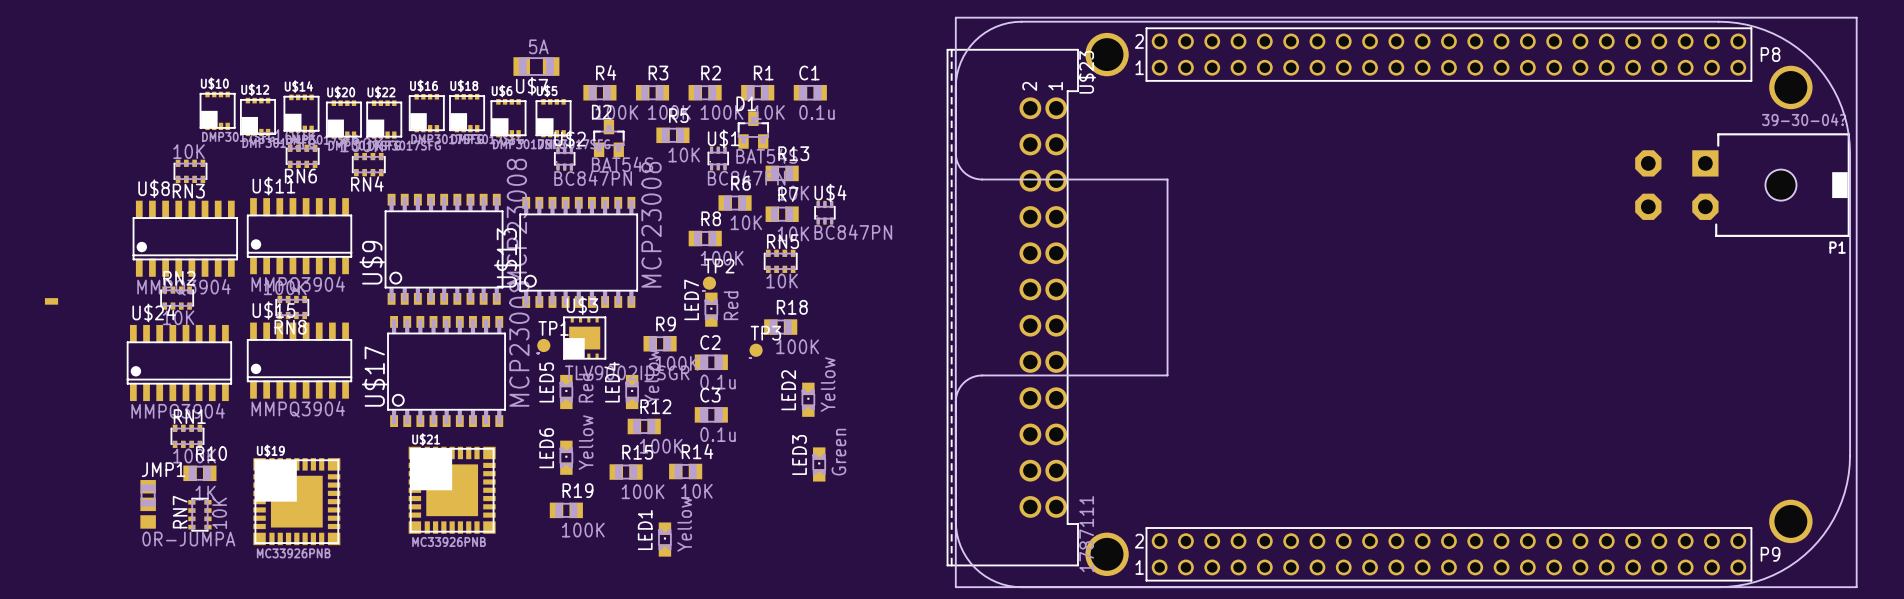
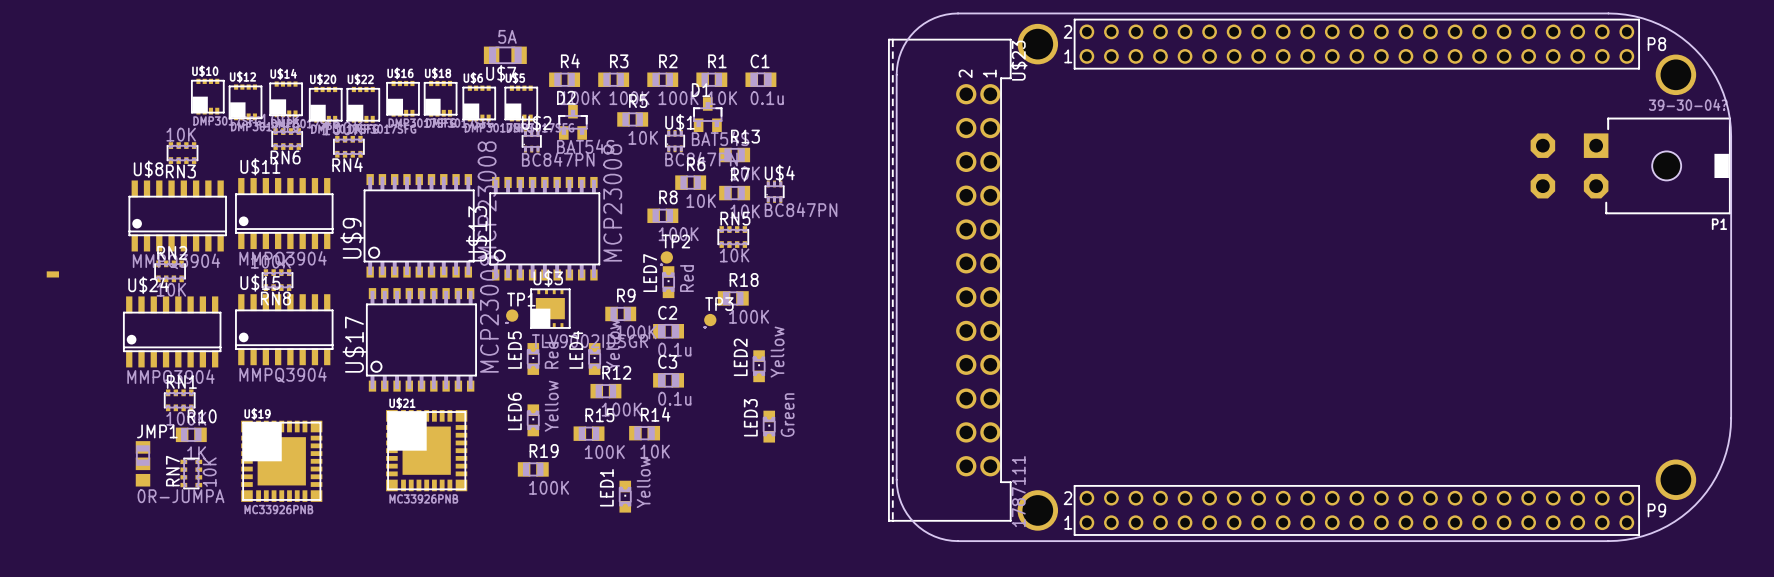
board edge: (955, 17) (1856, 17) (1856, 587) (955, 587) (955, 17) -> none
part footprint: [955, 21, 1851, 588] -> [896, 13, 1732, 542]

